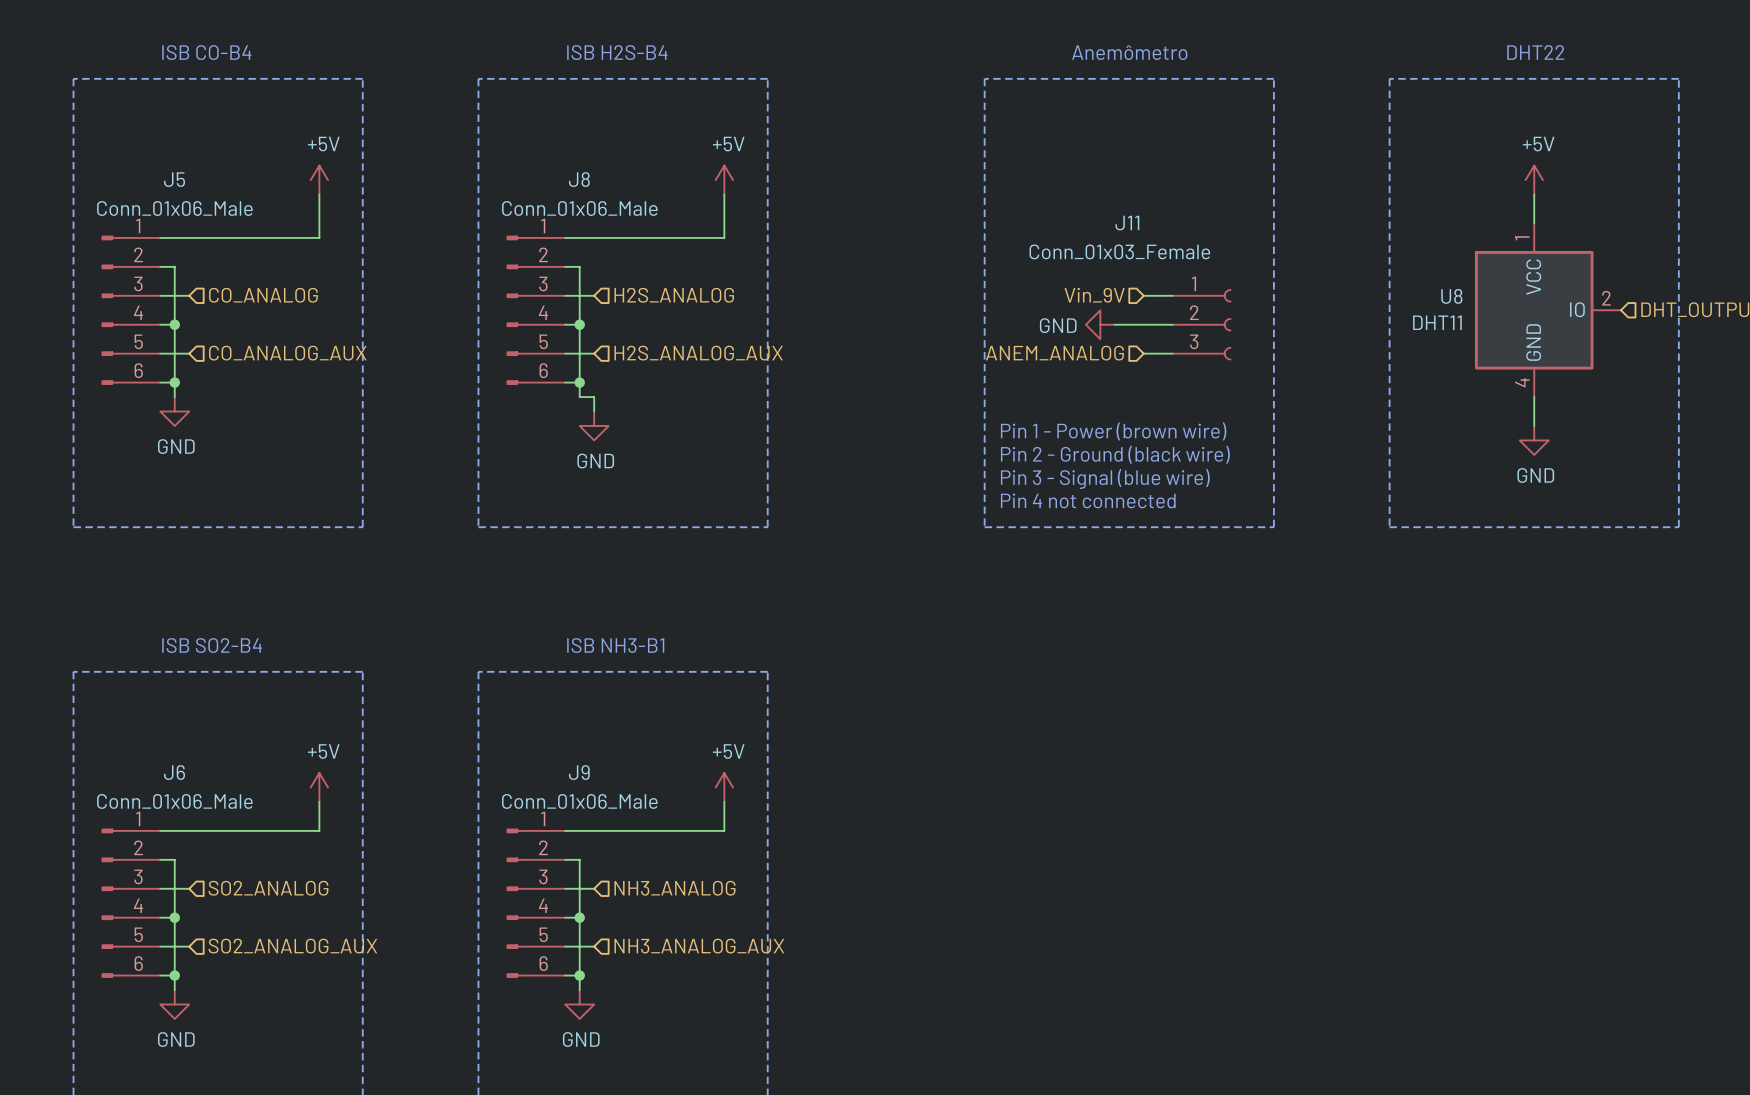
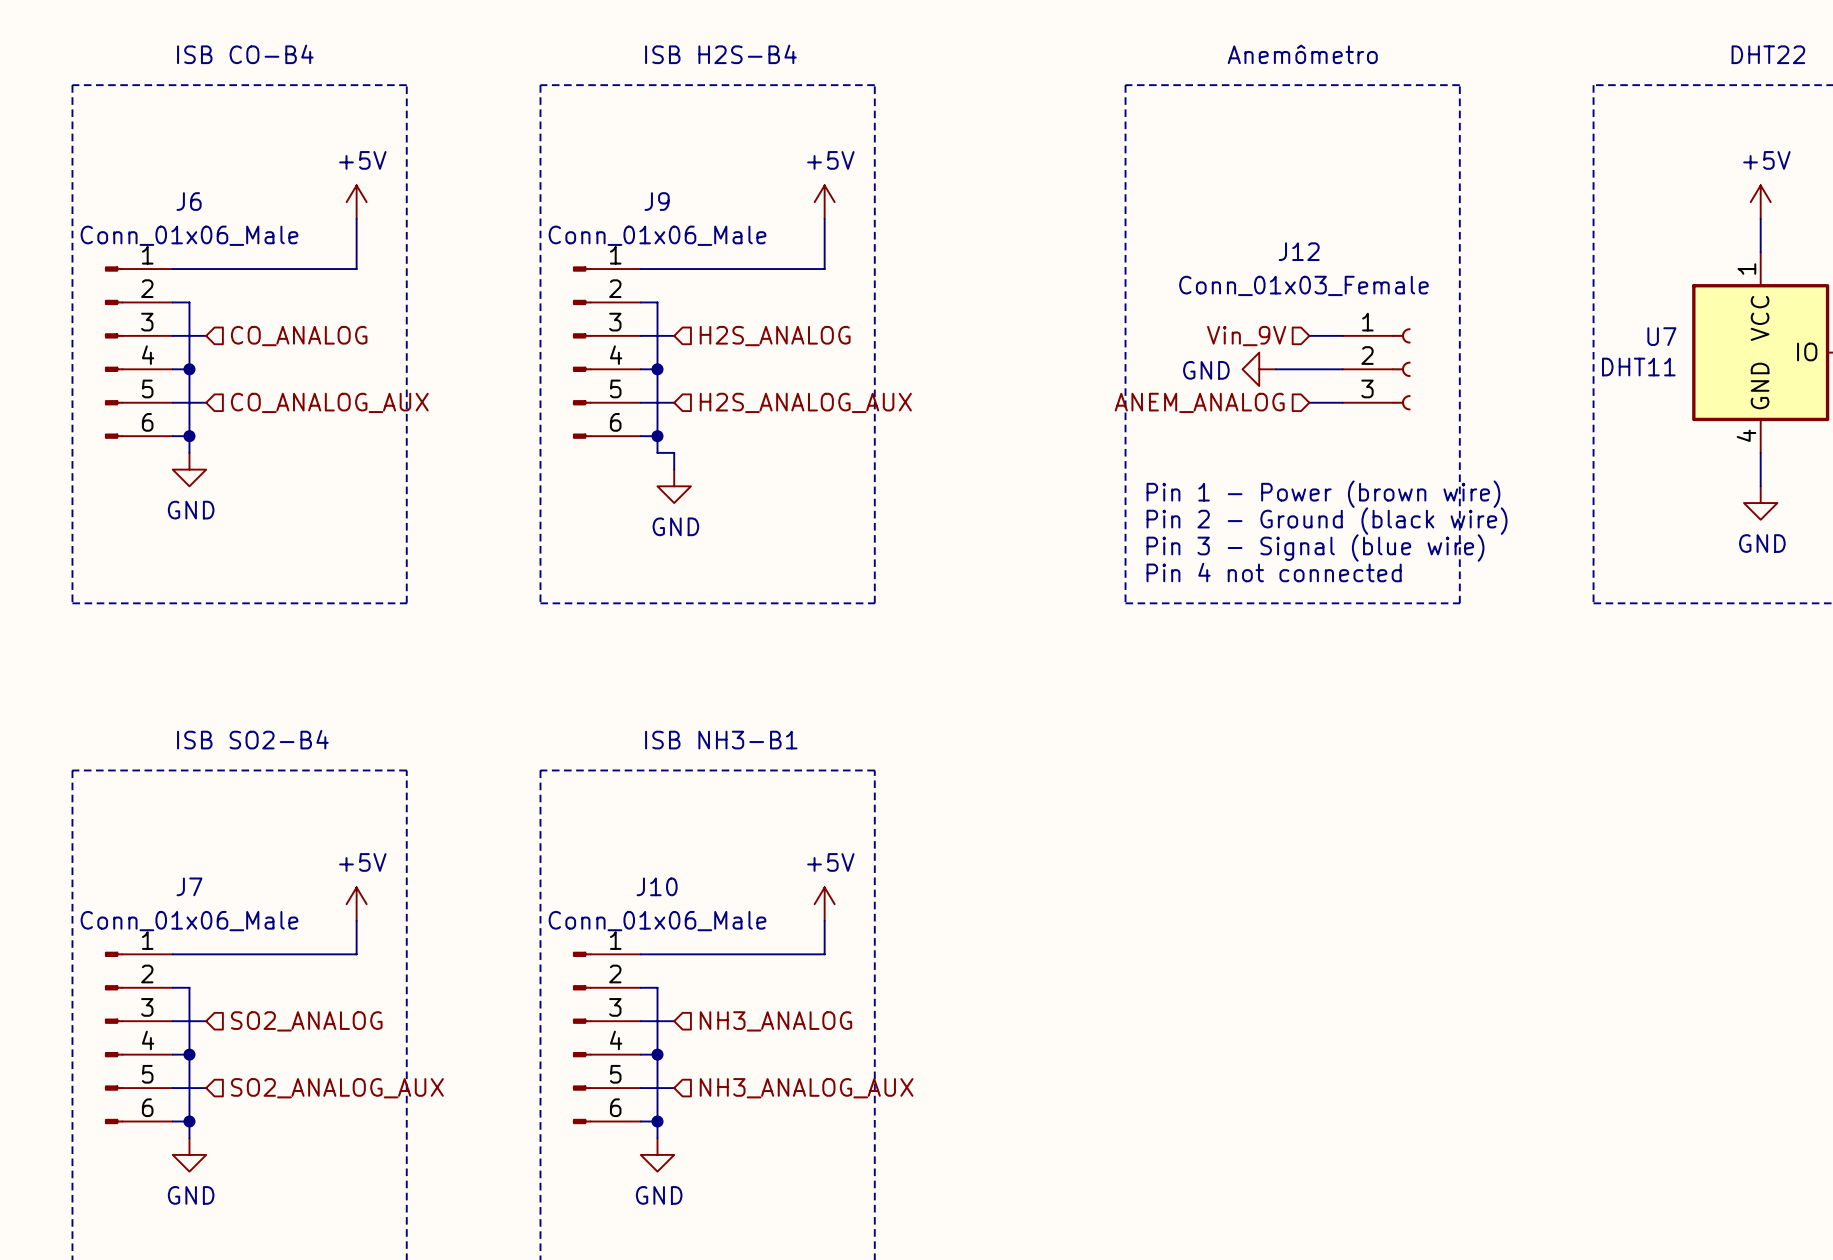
J5 name: J5 (174, 179) -> J6 (189, 201)
J8 name: J8 (579, 179) -> J9 (657, 201)
J11 name: J11 (1127, 223) -> J12 (1299, 251)
U8 name: U8 (1451, 296) -> U7 (1661, 336)
J6 name: J6 (174, 772) -> J7 (189, 886)
J9 name: J9 (579, 772) -> J10 (657, 886)

